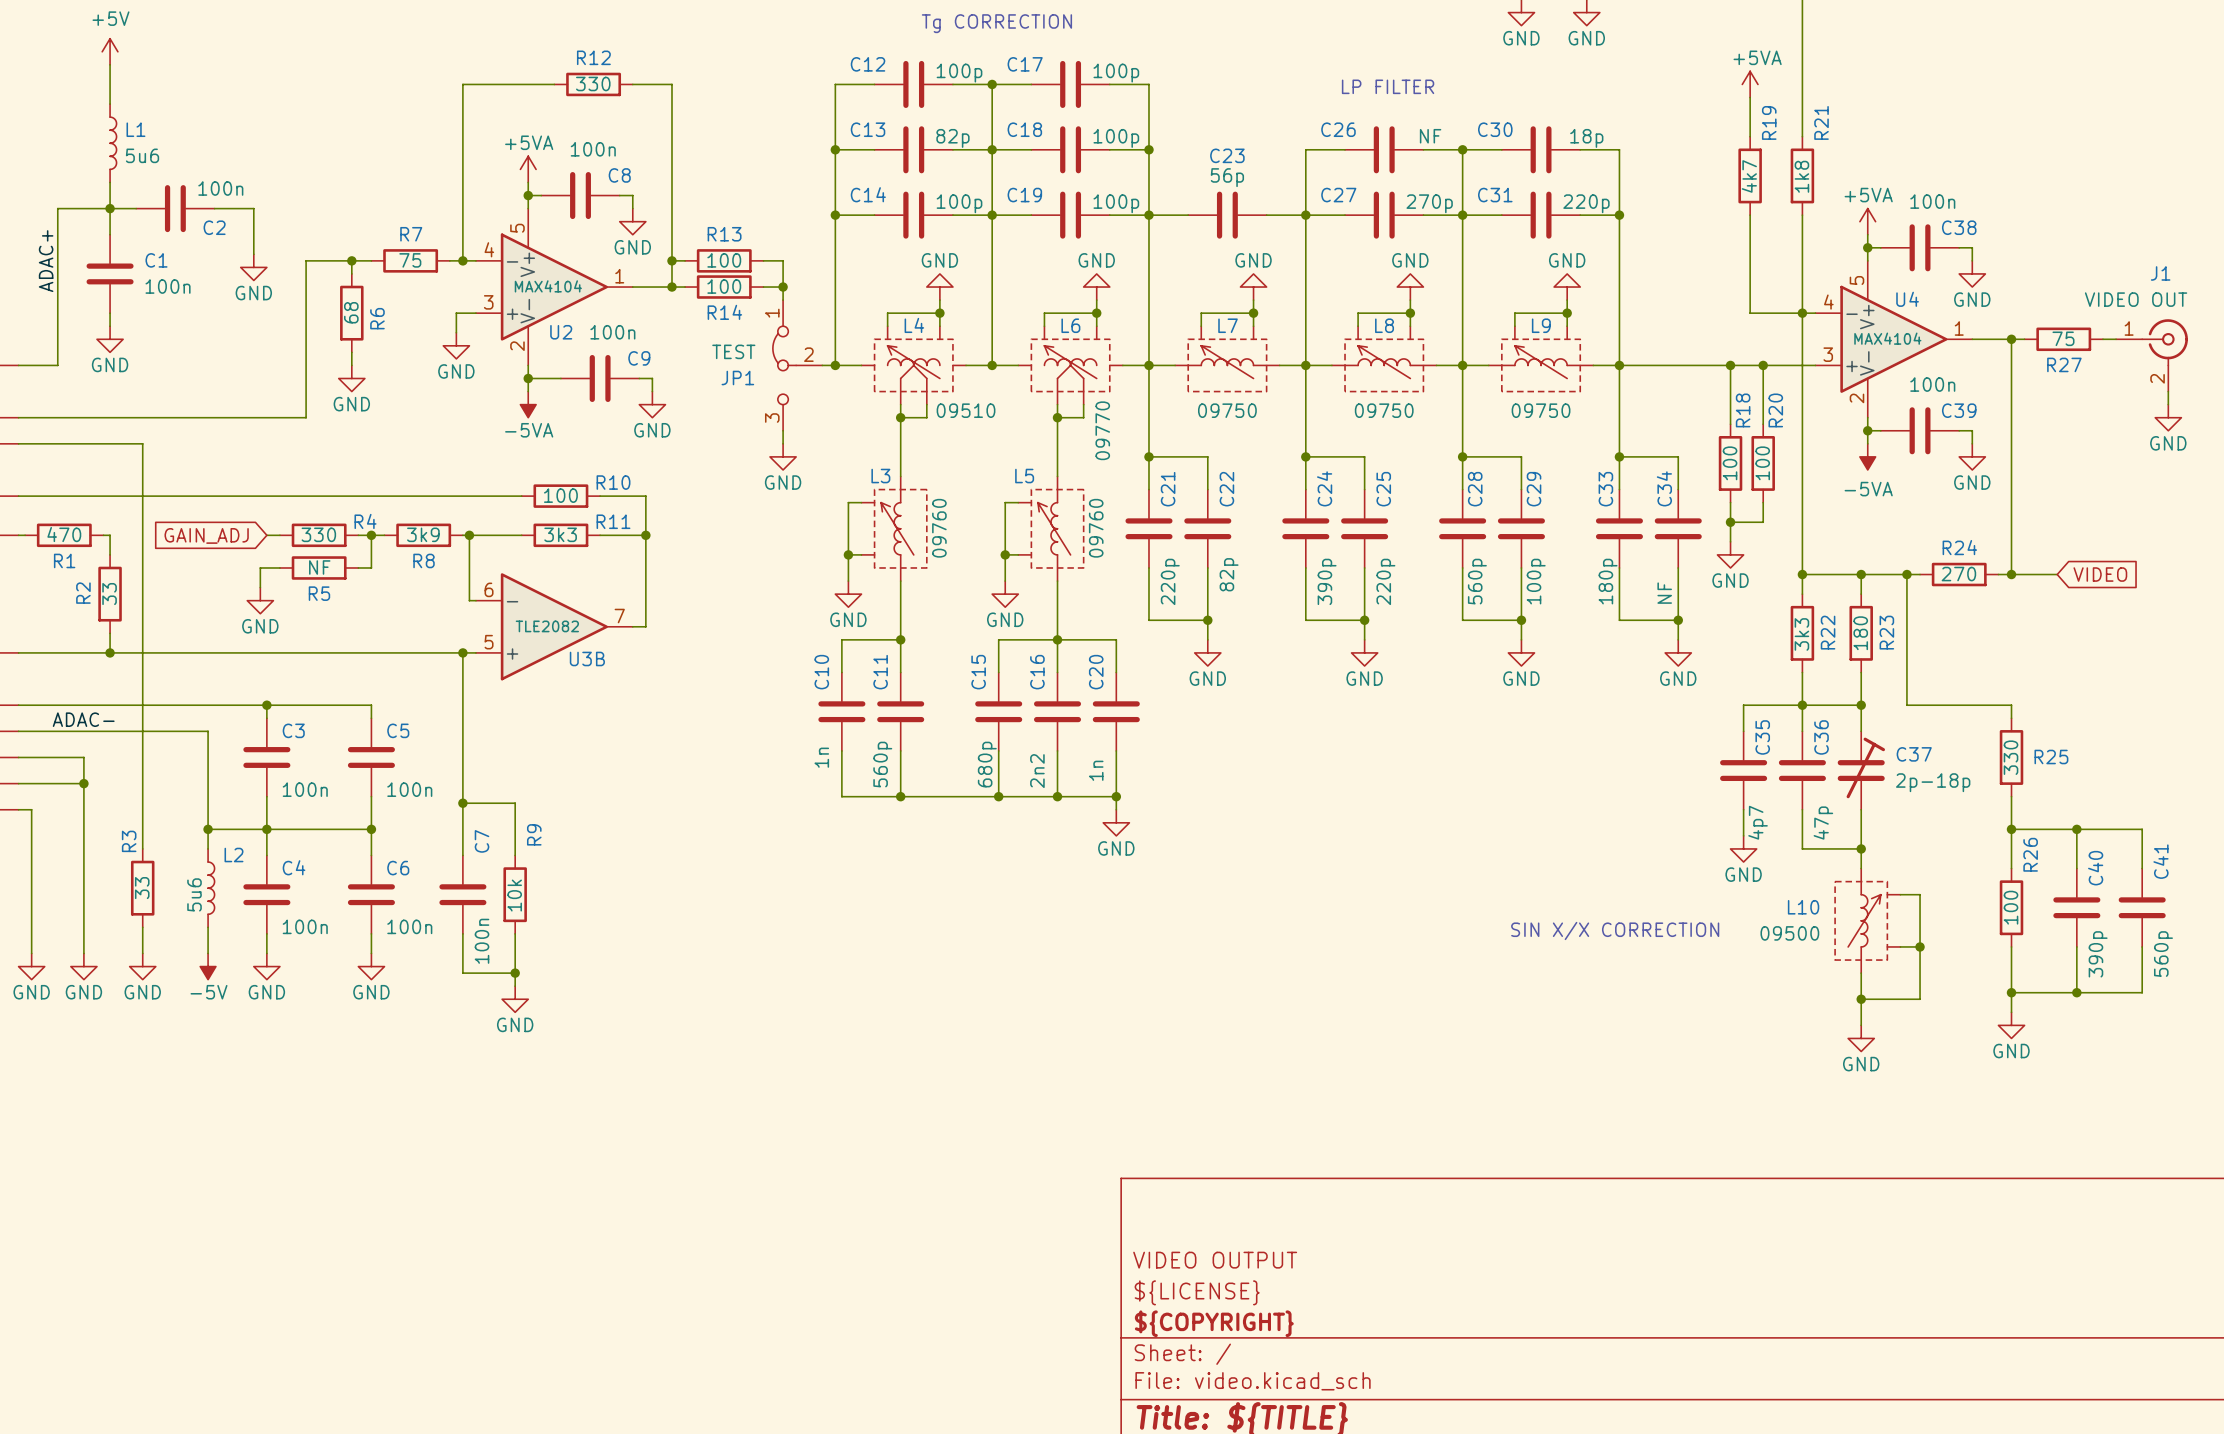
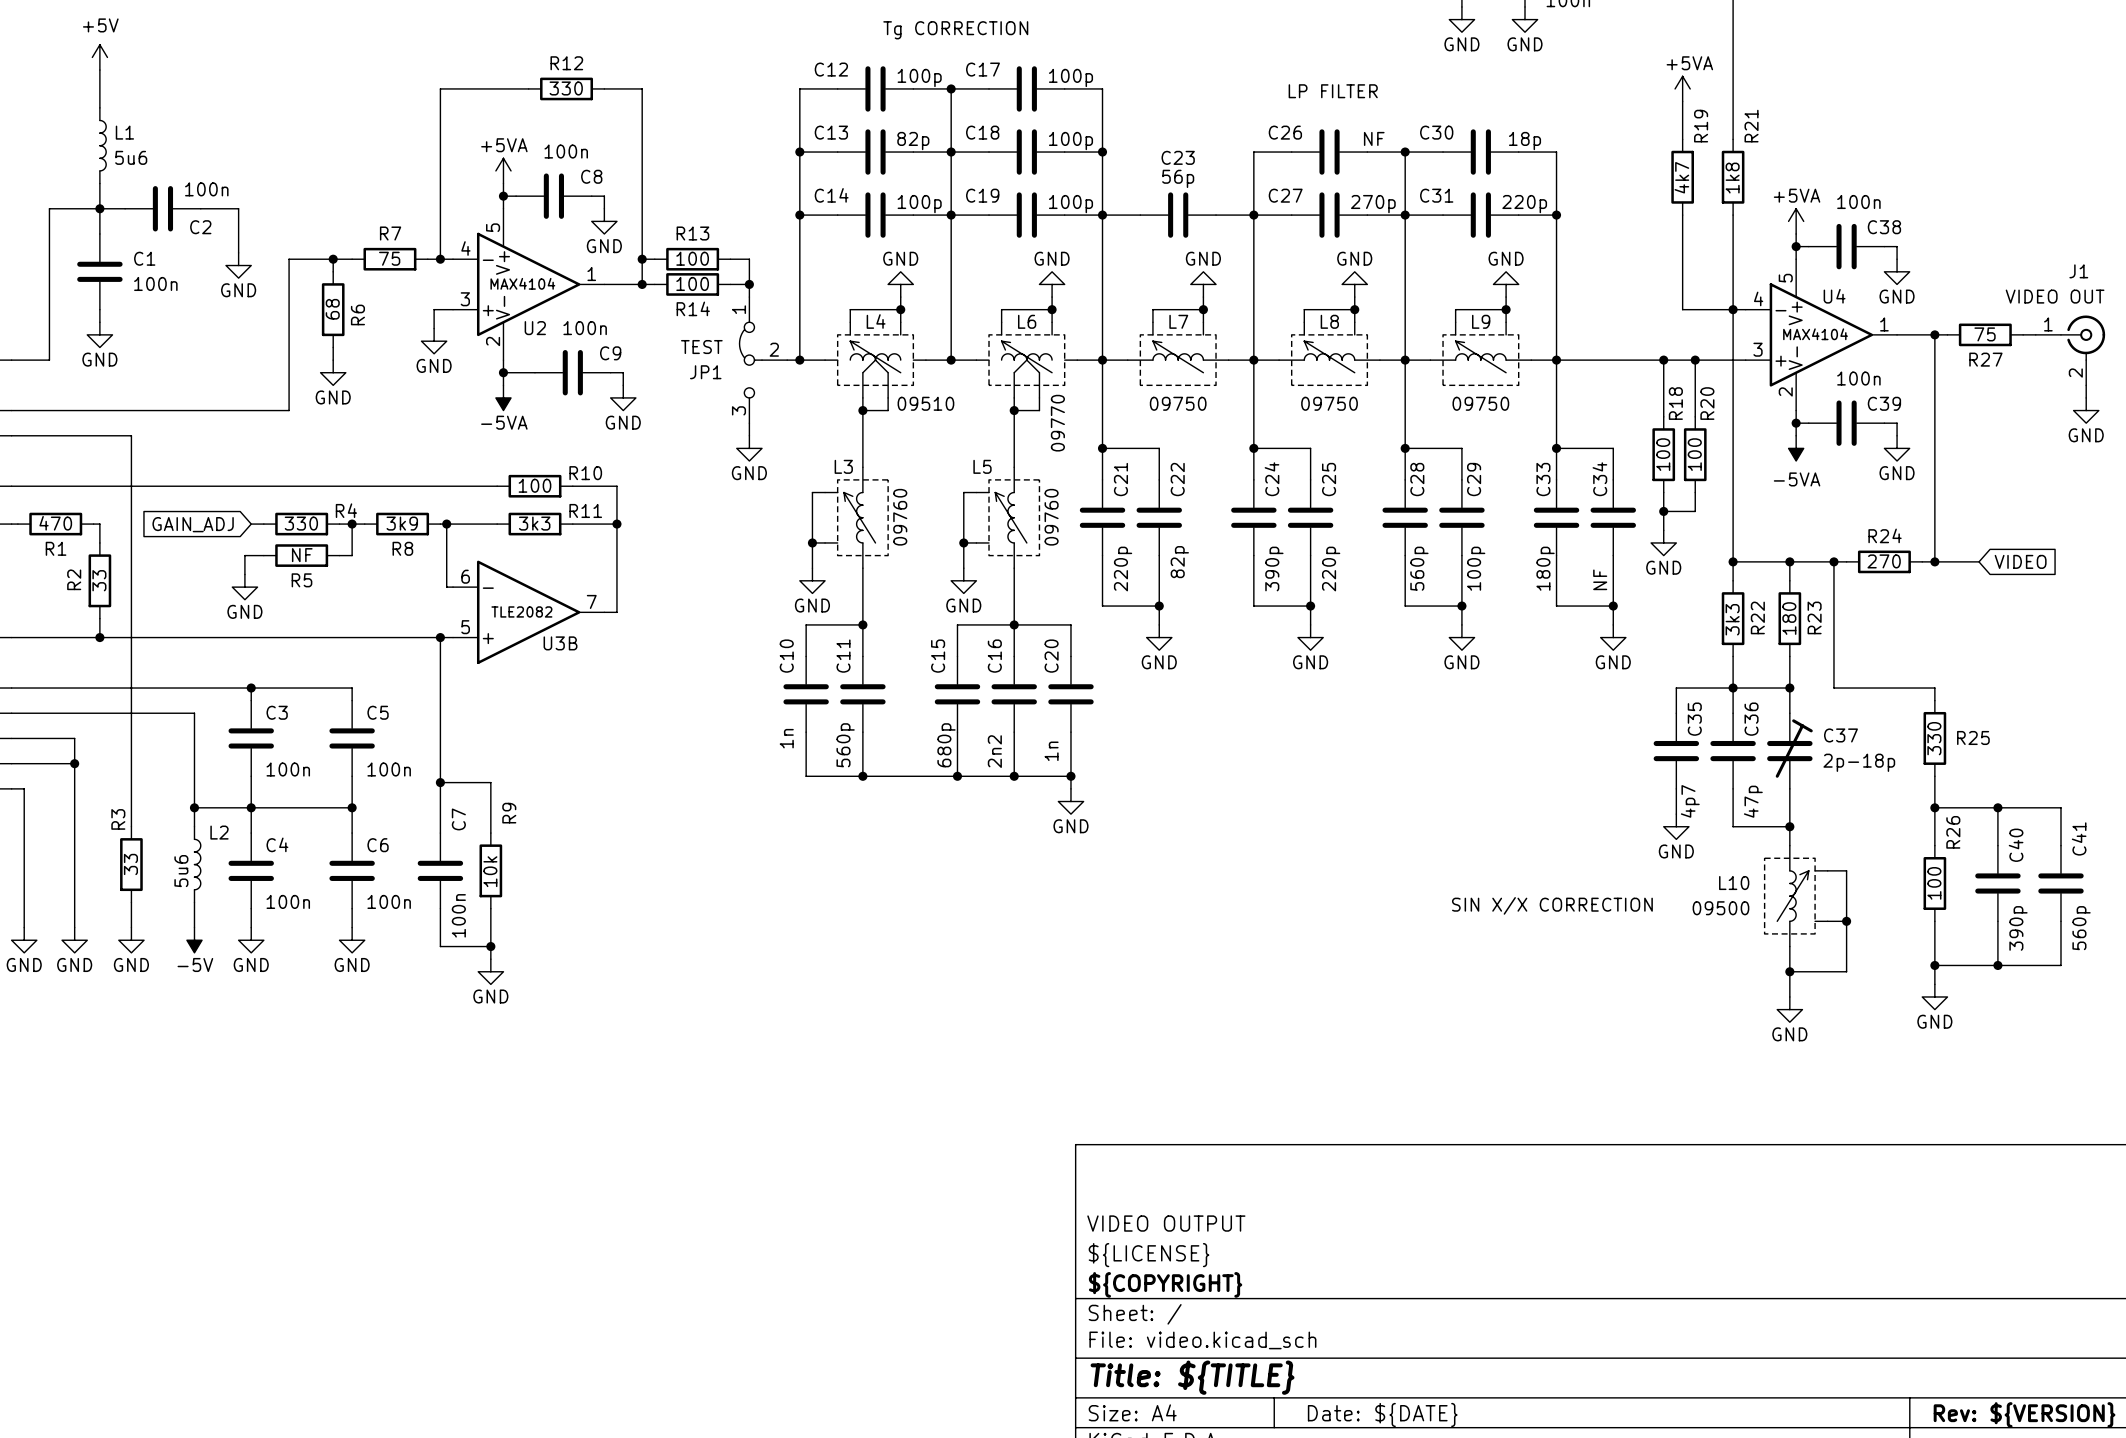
label: ADAC+ (46, 261) -> none
label: ADAC- (83, 719) -> none

